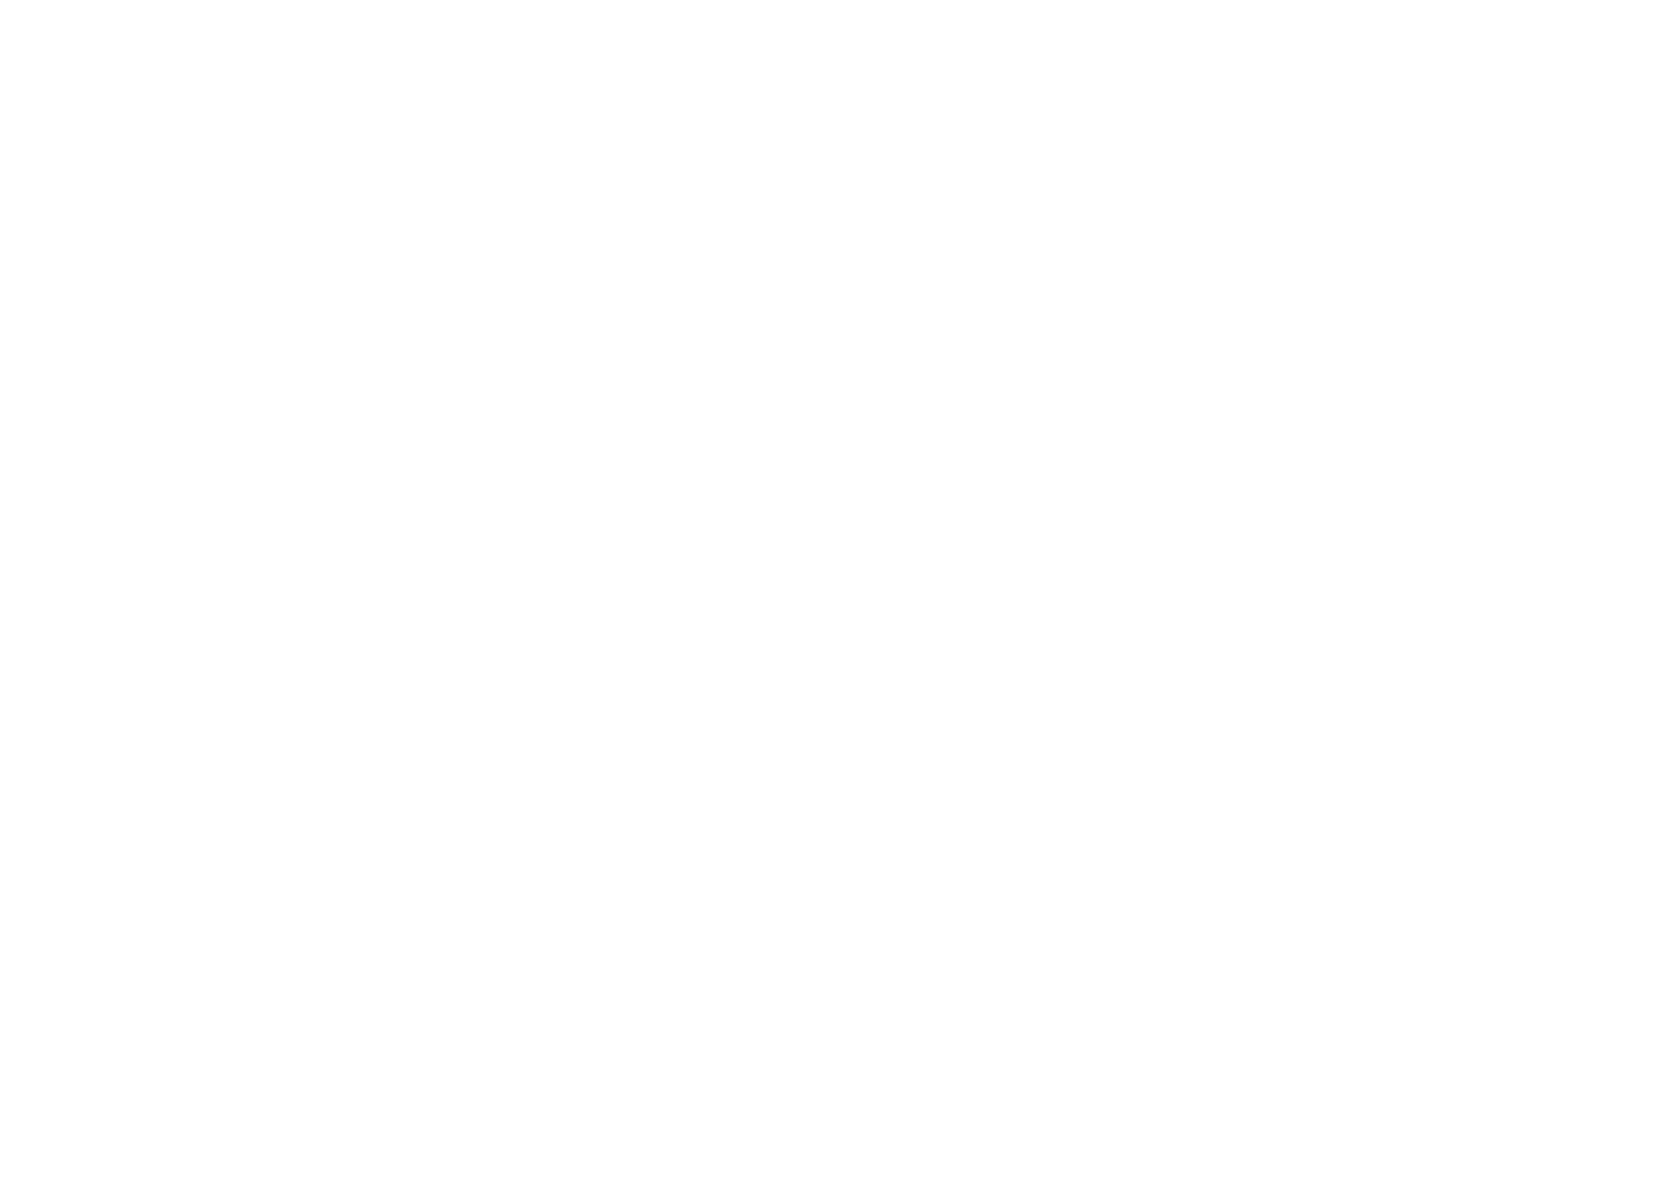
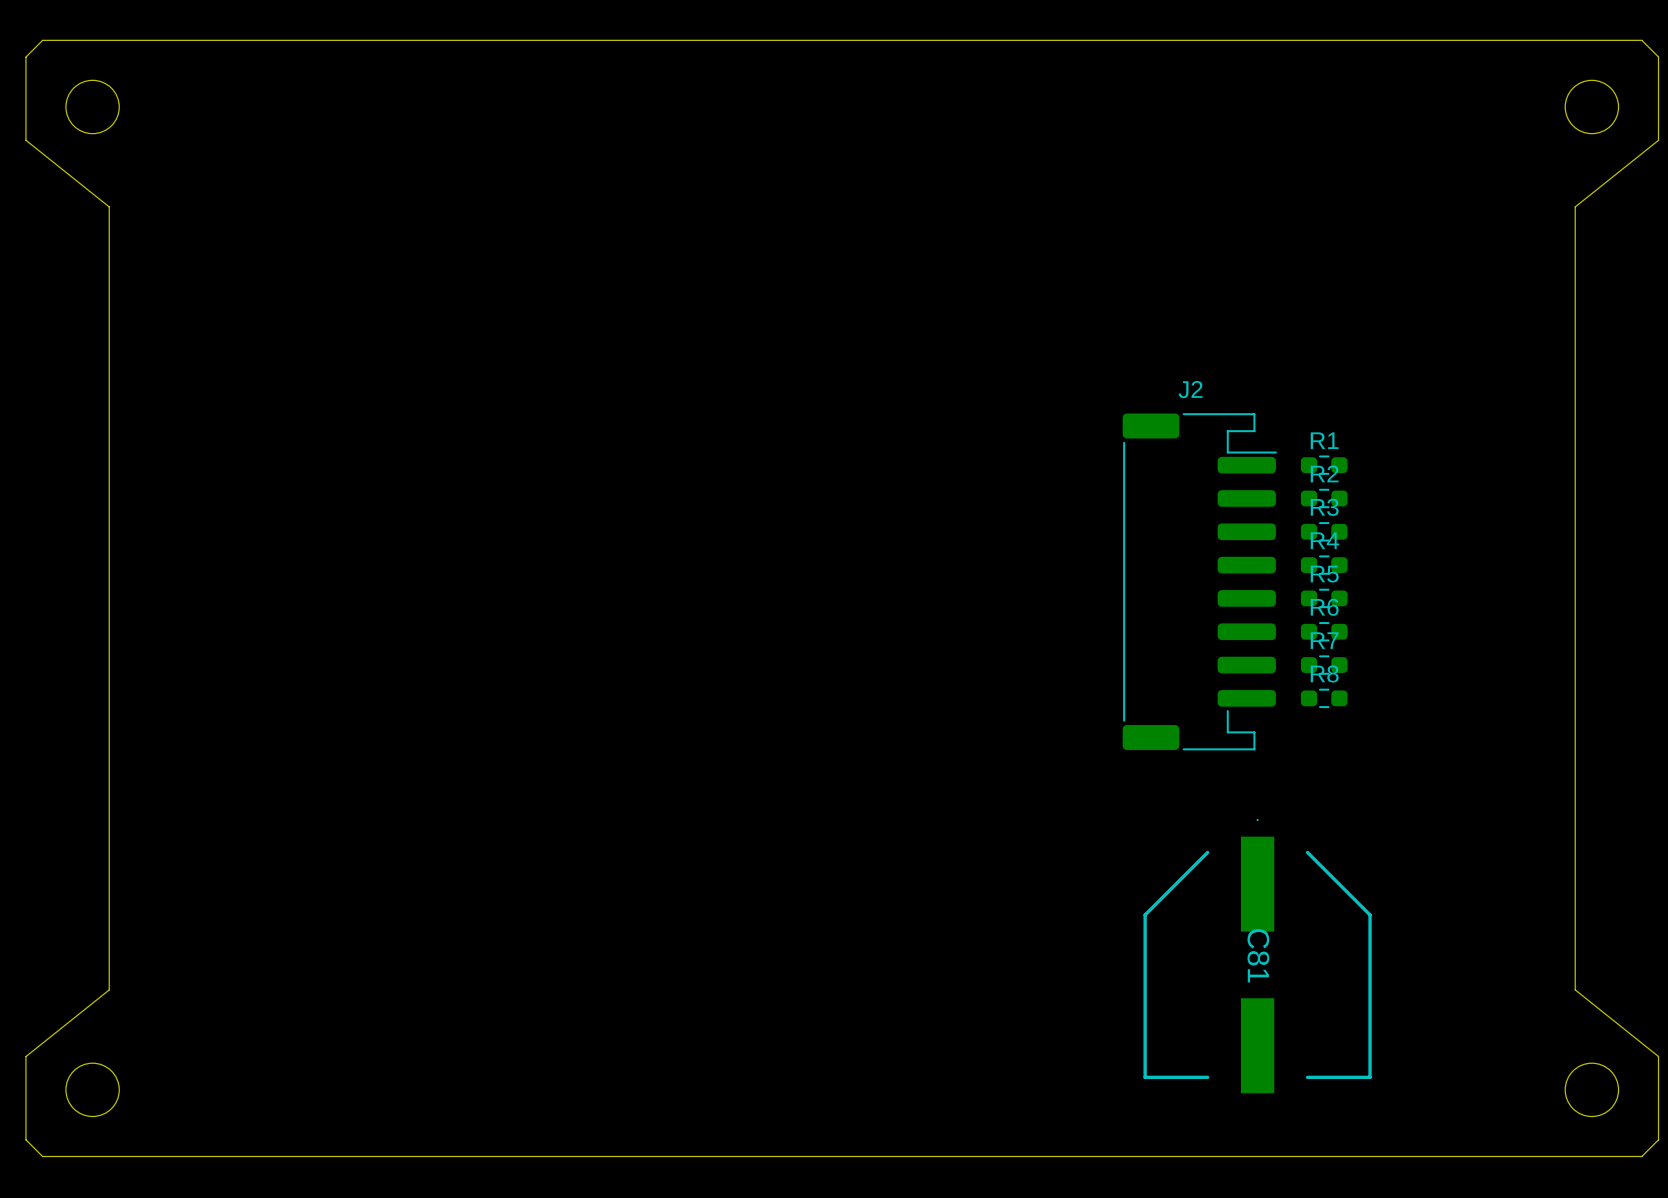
board edge: none -> (1641, 40) (42, 40) (25, 57) (25, 140) (109, 206) (109, 989) (25, 1056) (25, 1139) (42, 1156) (1641, 1156) (1658, 1139) (1658, 1056) (1575, 989) (1575, 206) (1658, 140) (1658, 57) (1641, 40)
round board edge: none -> [65, 79, 120, 135]
round board edge: none -> [1564, 79, 1619, 135]
R1: none -> (1324, 465)
R2: none -> (1324, 498)
R3: none -> (1324, 531)
R4: none -> (1324, 565)
J2: none -> (1199, 581)
R5: none -> (1324, 598)
R6: none -> (1324, 631)
R7: none -> (1324, 665)
R8: none -> (1324, 698)
C81: none -> (1257, 956)
round board edge: none -> [65, 1062, 120, 1117]
round board edge: none -> [1564, 1062, 1619, 1117]

